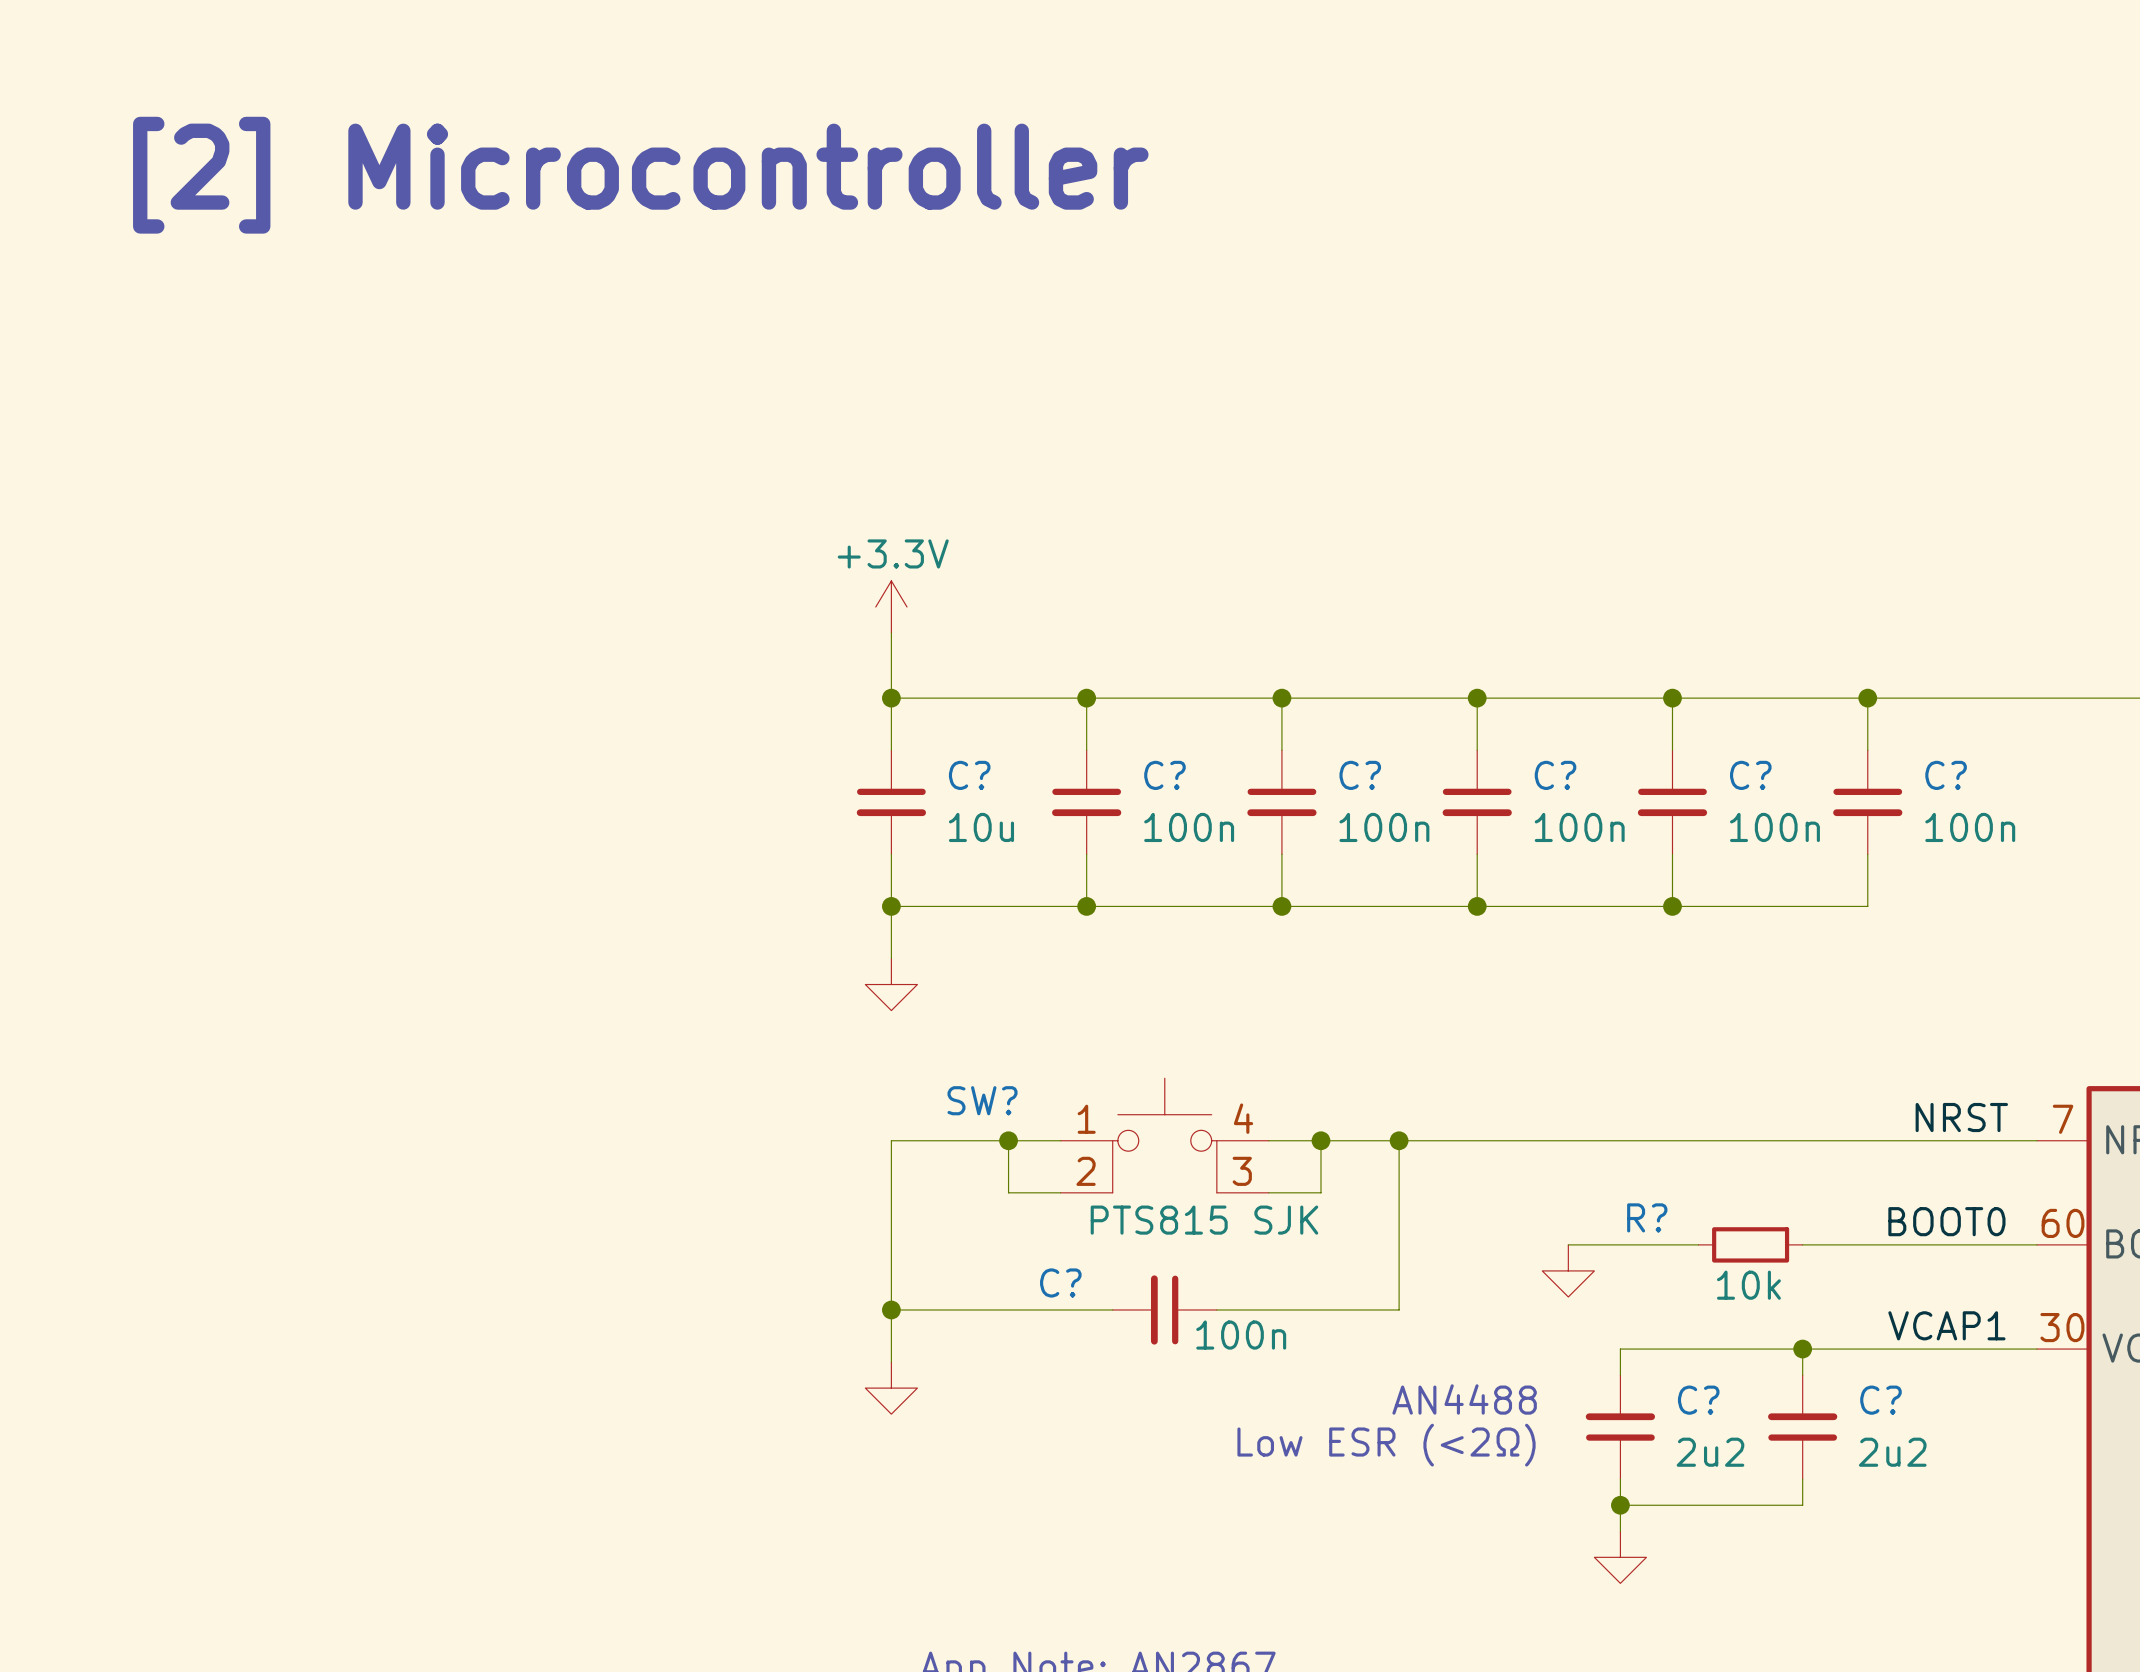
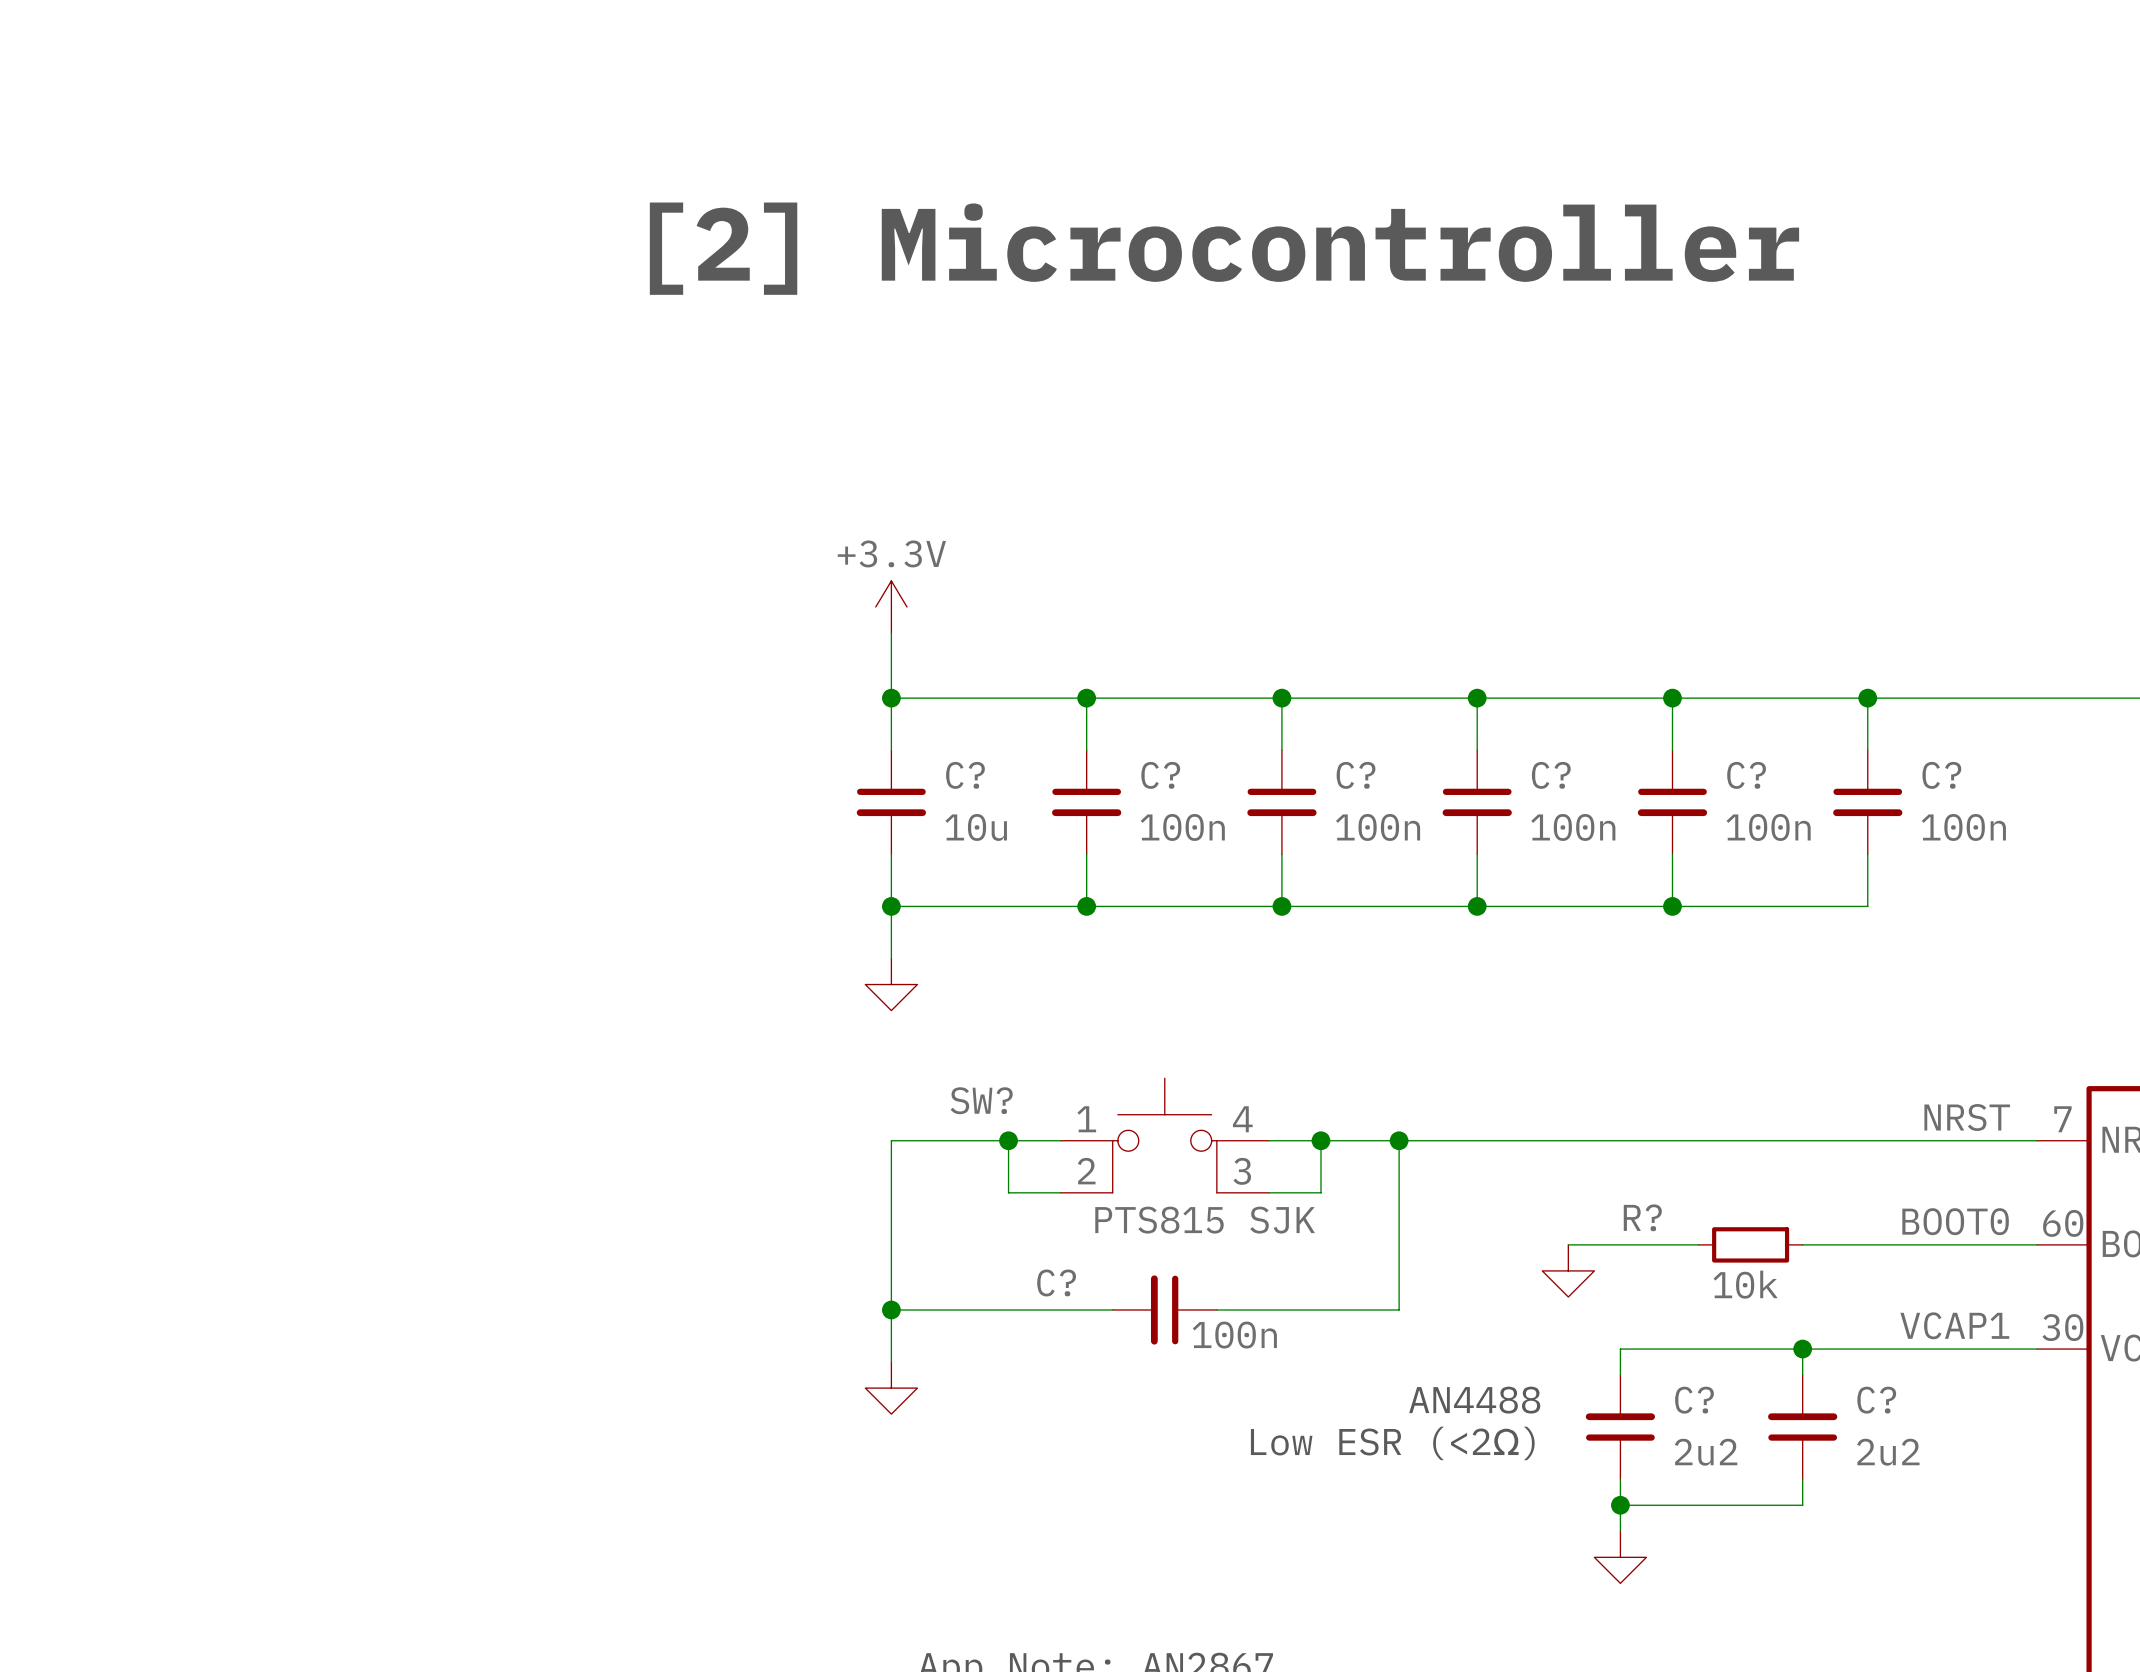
text: [2] Microcontroller (640, 175) -> none
text: none -> [2] Microcontroller (1224, 248)

